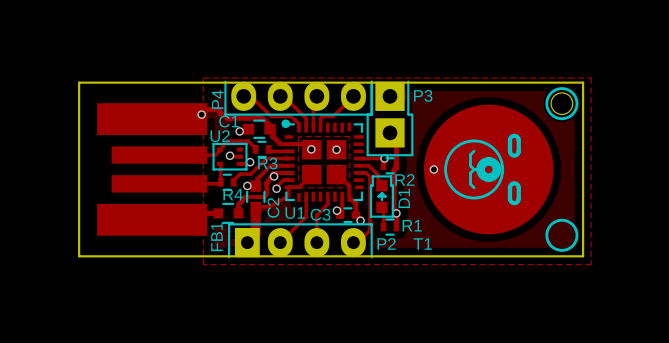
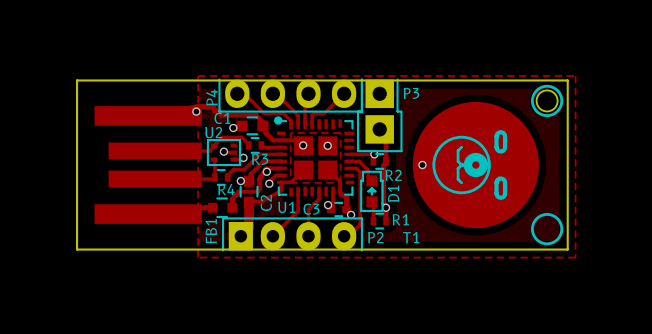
part footprint: [97, 103, 208, 236] -> [94, 106, 202, 224]

